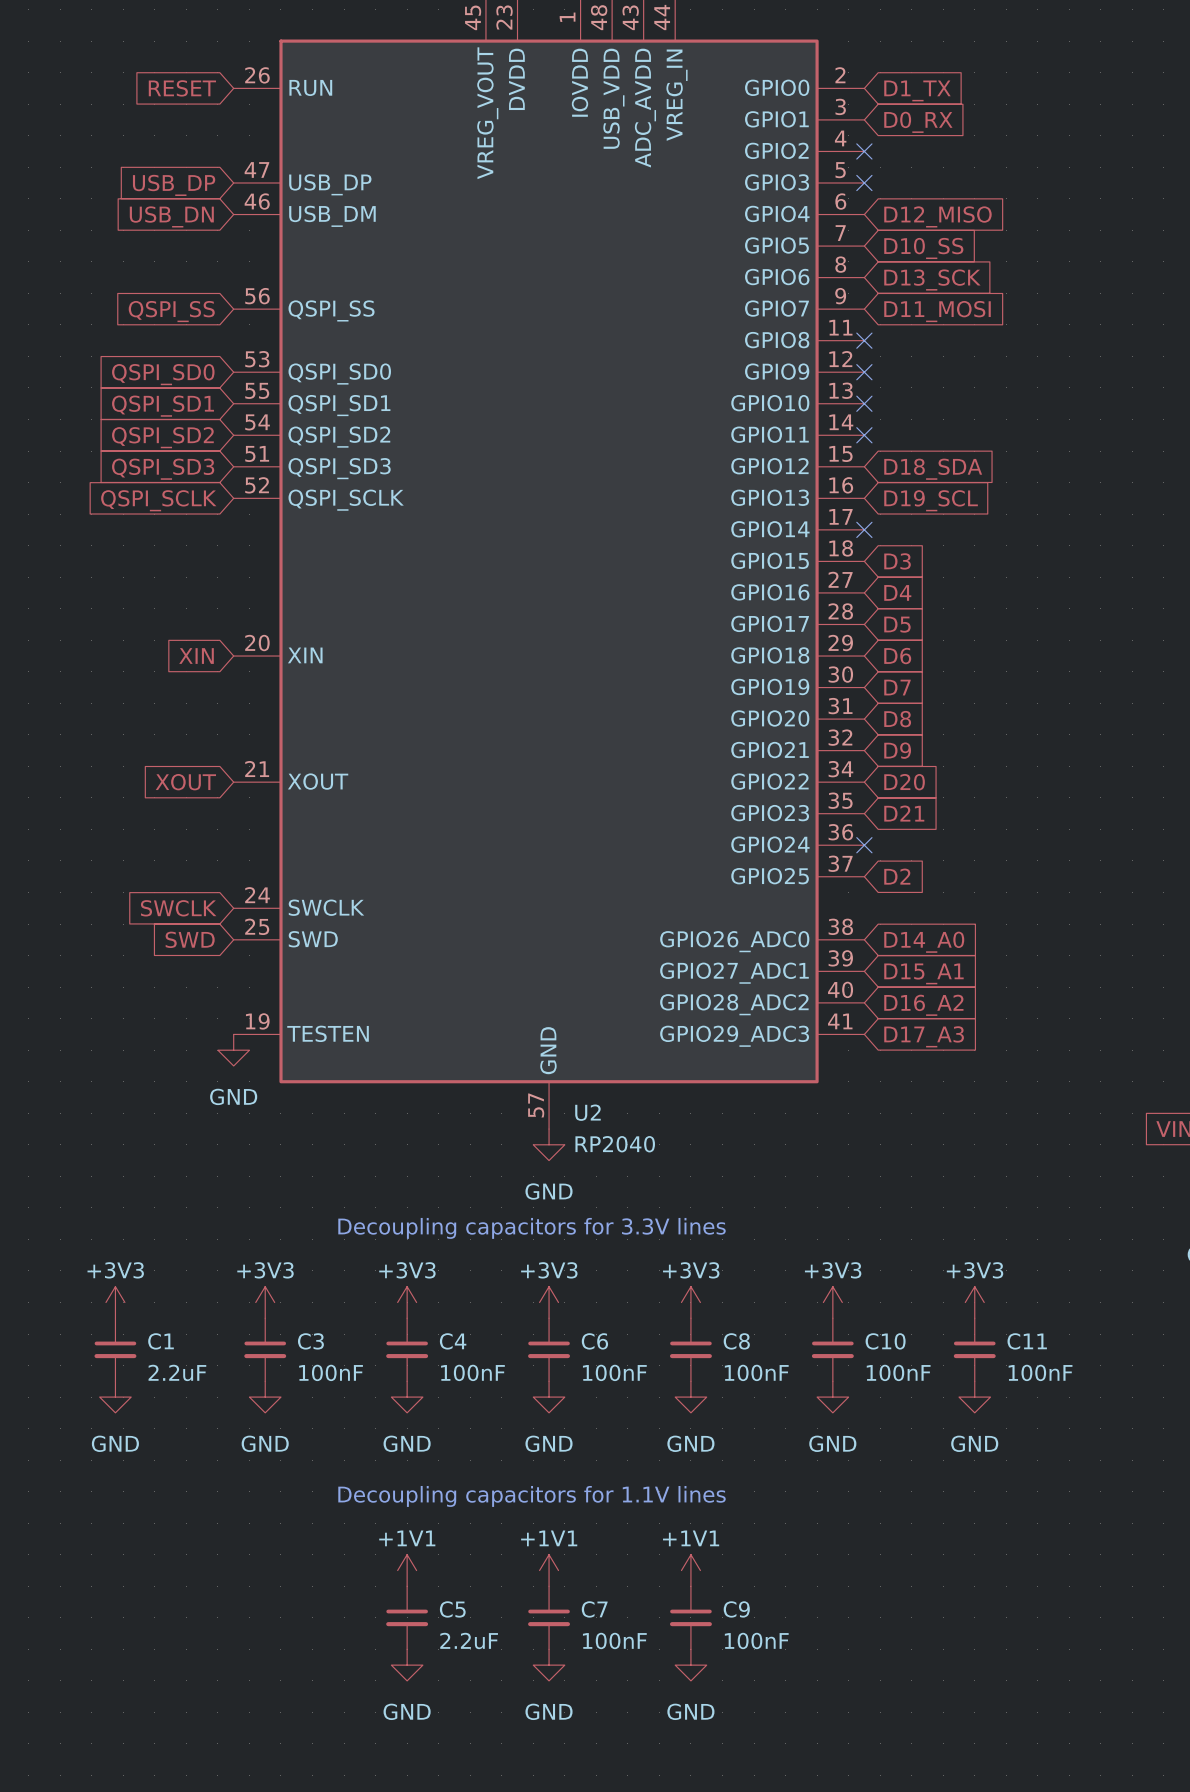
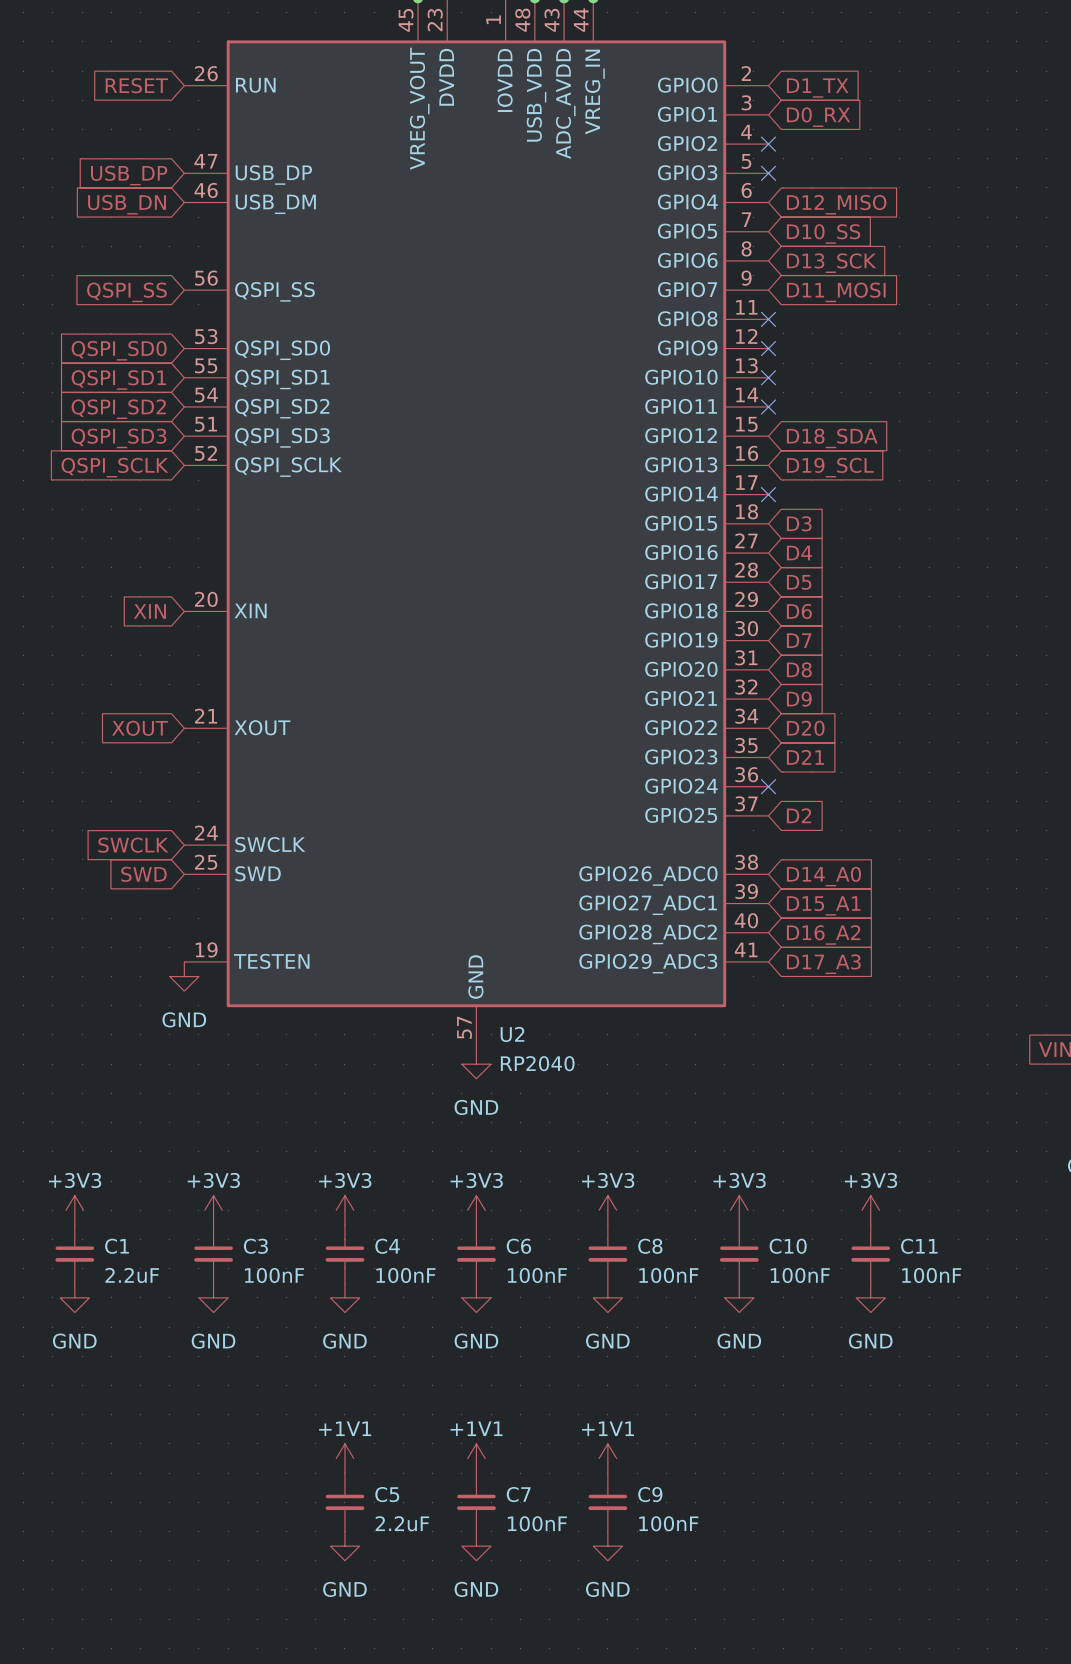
text: Decoupling capacitors for 3.3V lines (532, 1228) -> none
text: Decoupling capacitors for 1.1V lines (532, 1496) -> none

